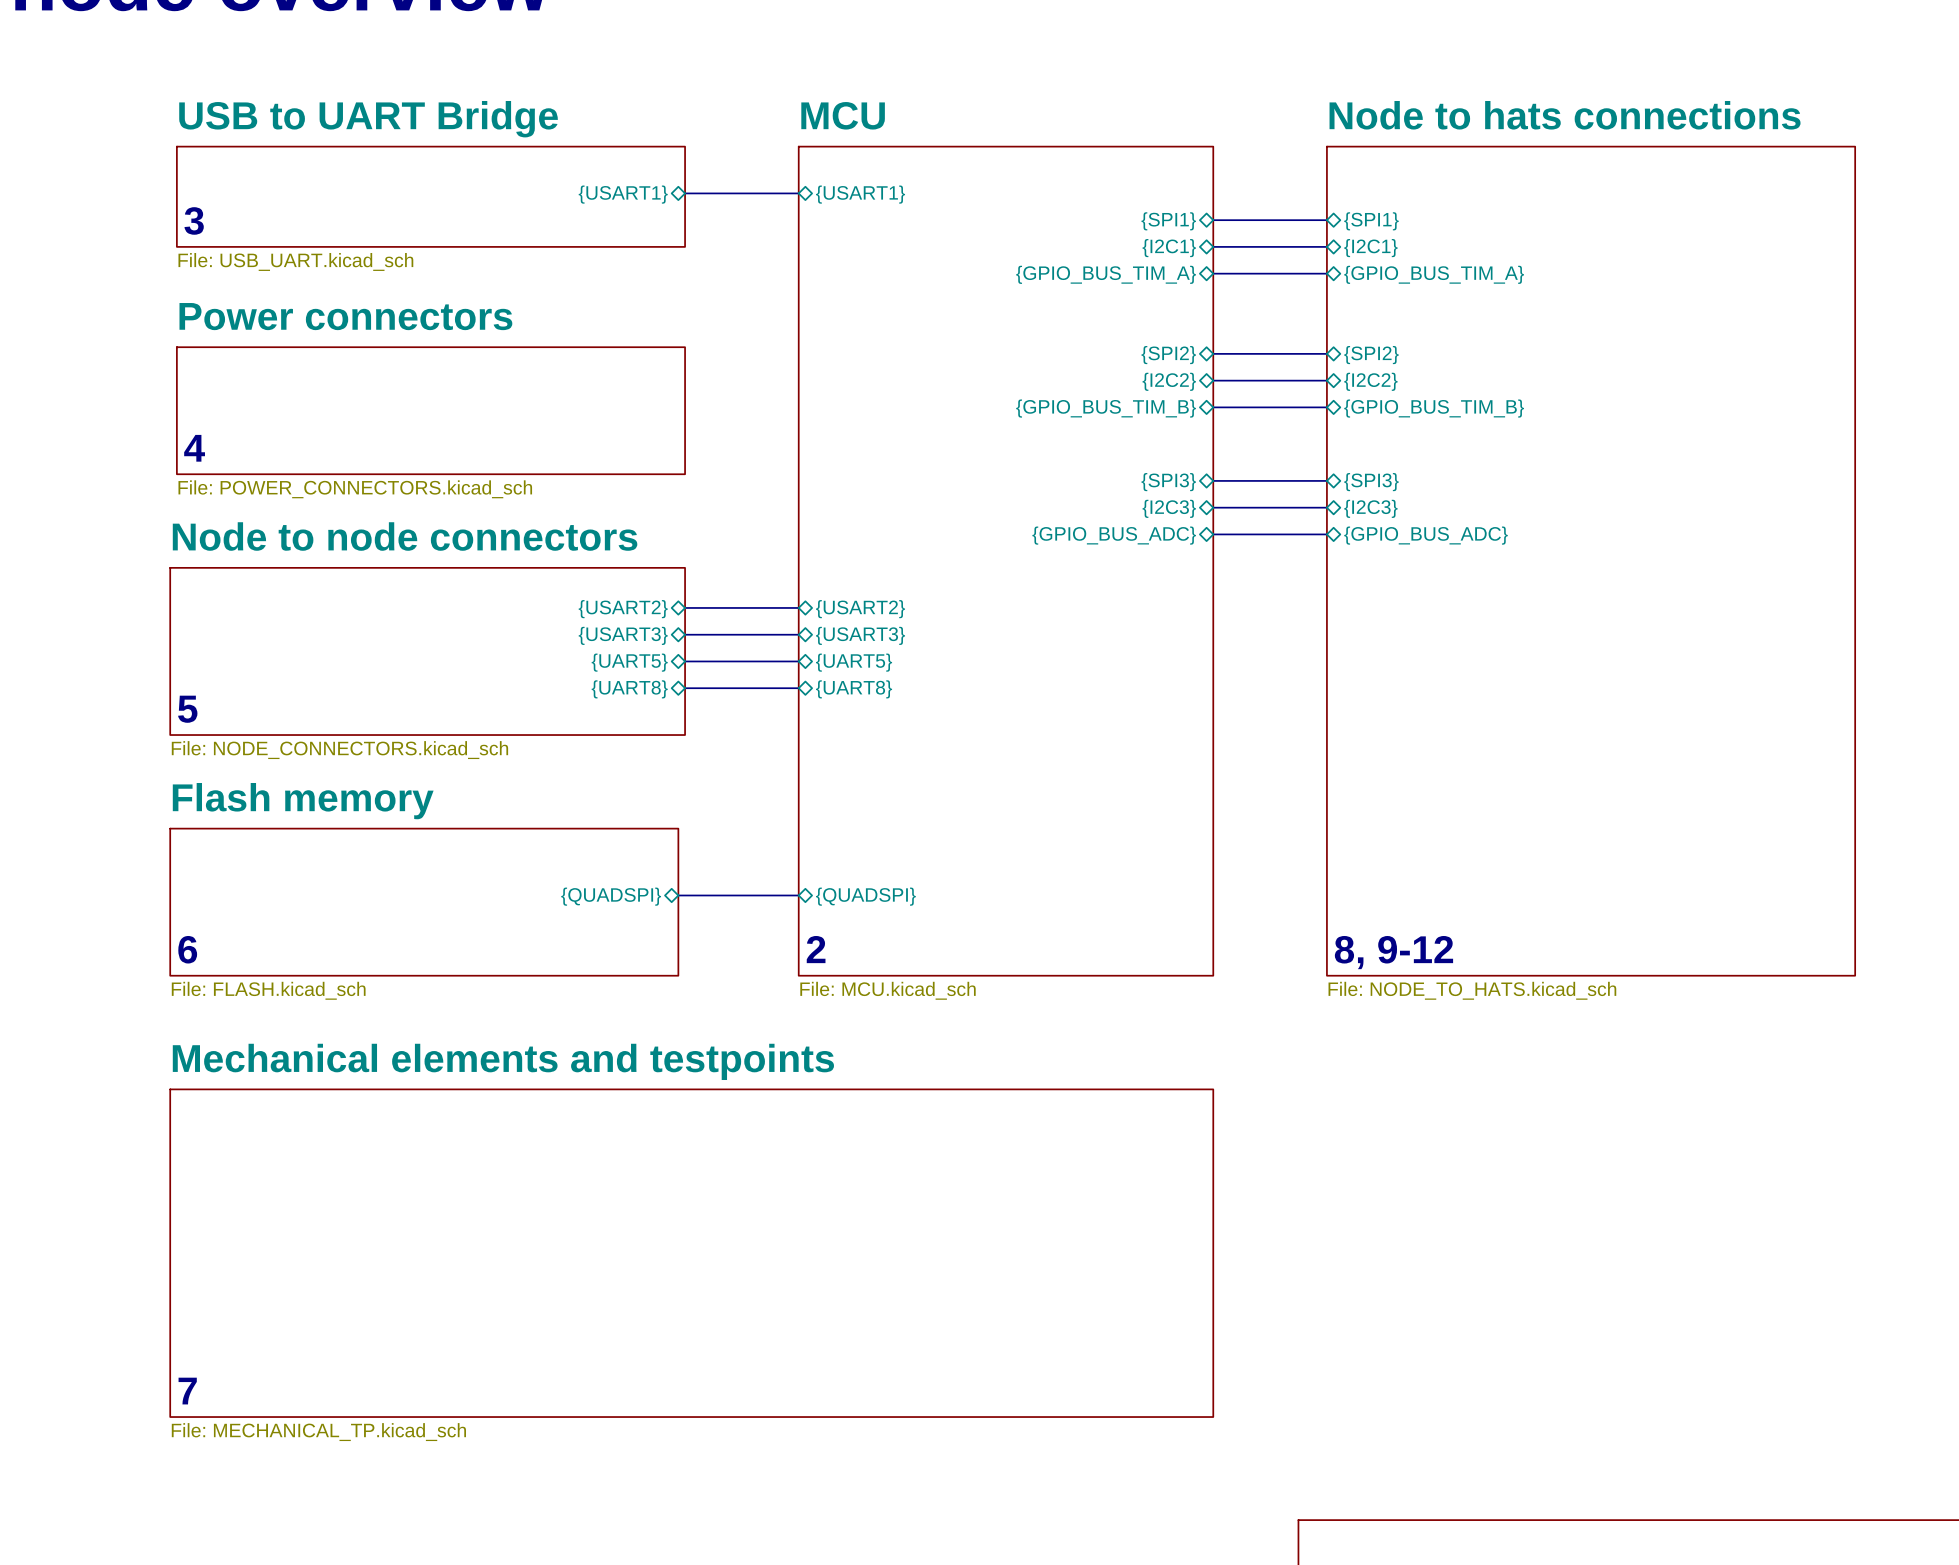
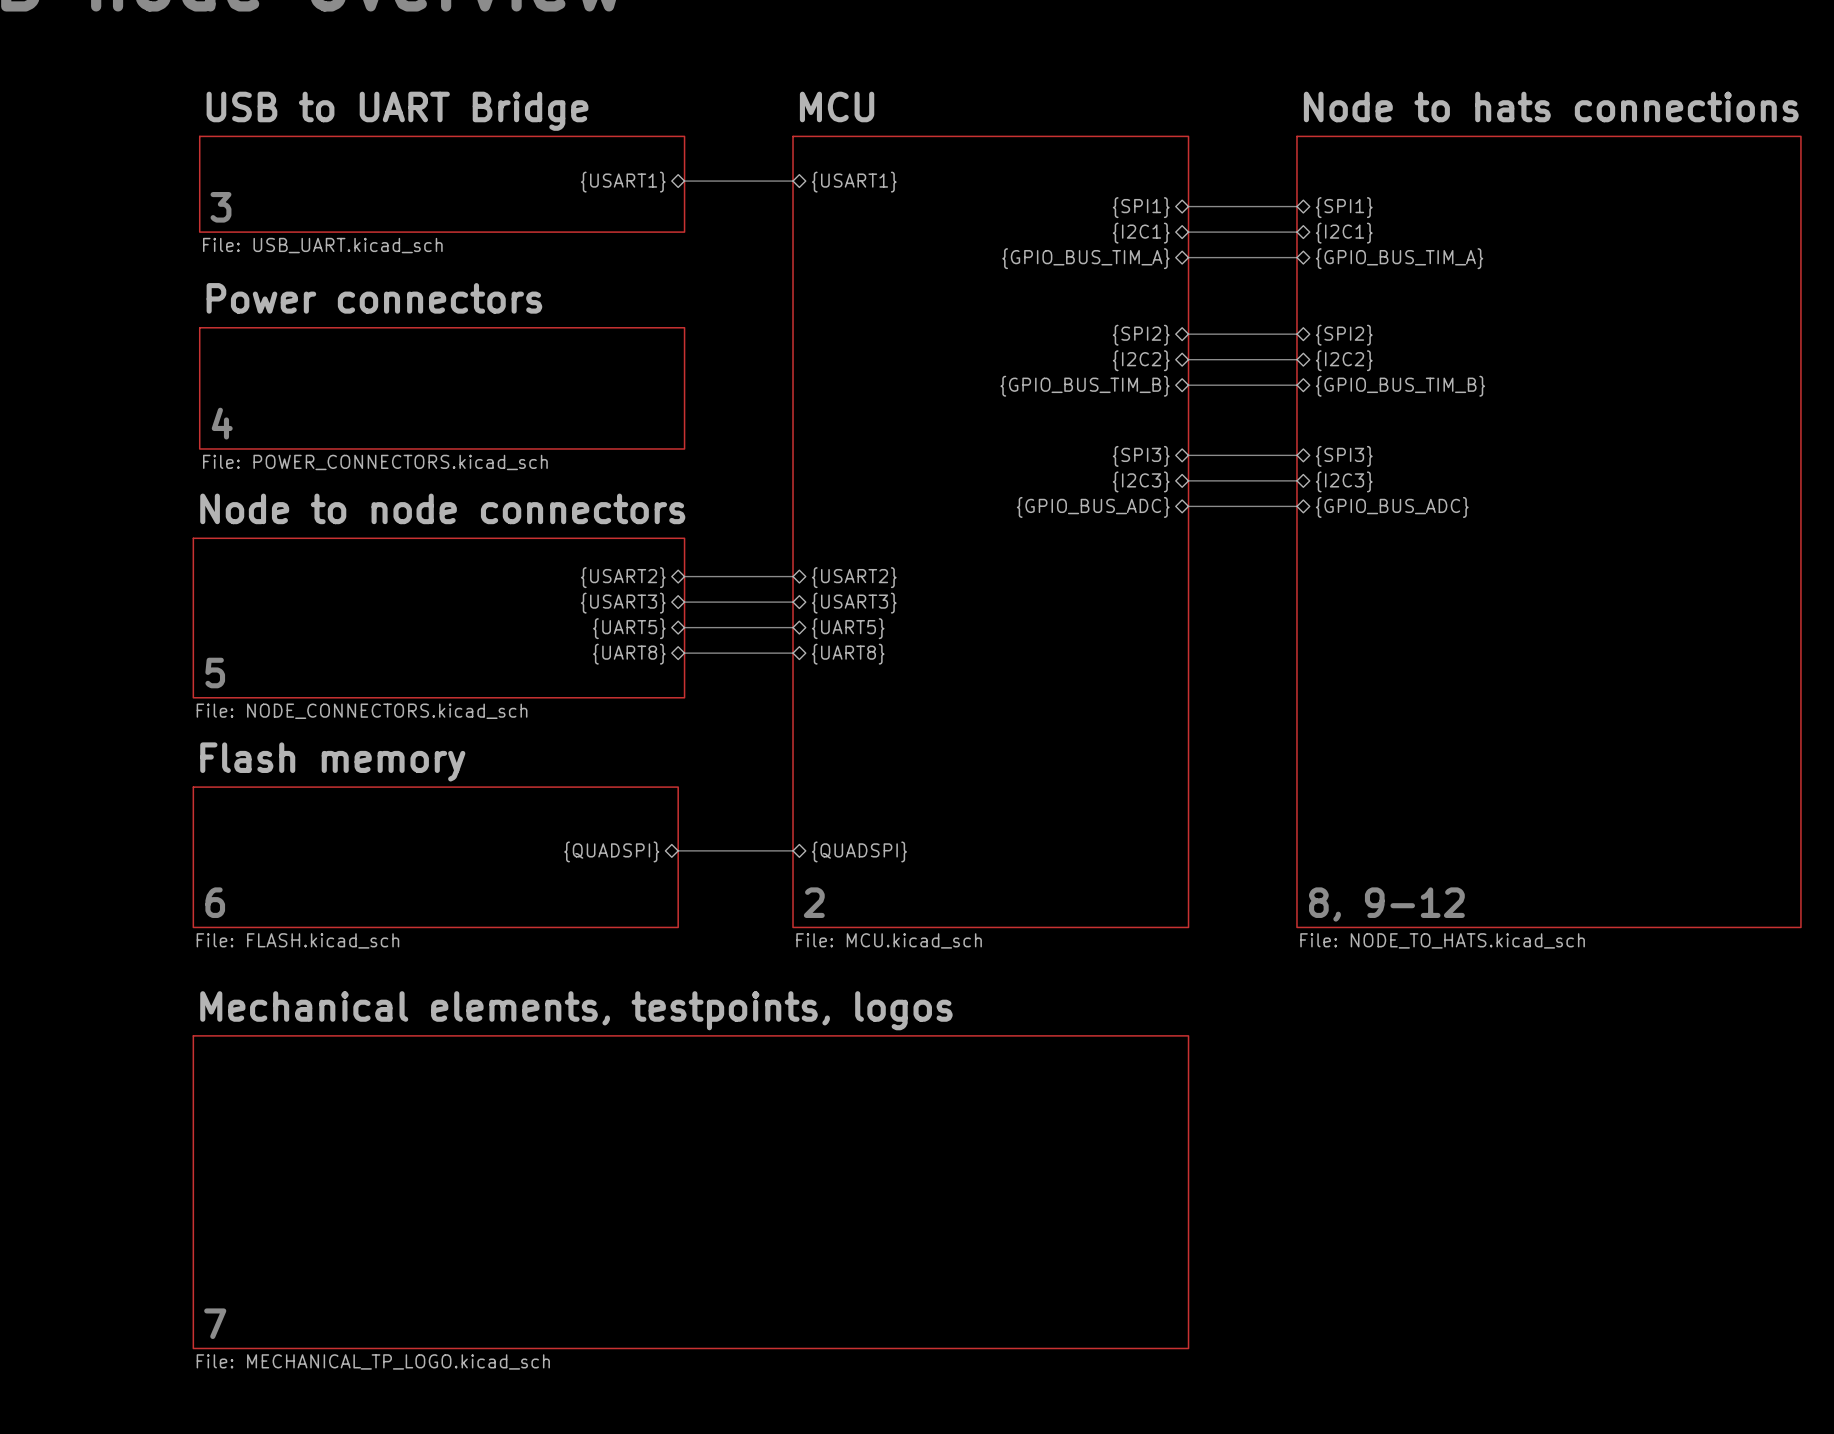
sheet Mechanical elements and testpoints name: Mechanical elements and testpoints (503, 1061) -> Mechanical elements, testpoints, logos (576, 1010)
sheet Mechanical elements and testpoints value: File: MECHANICAL_TP.kicad_sch (318, 1432) -> File: MECHANICAL_TP_LOGO.kicad_sch (373, 1361)

